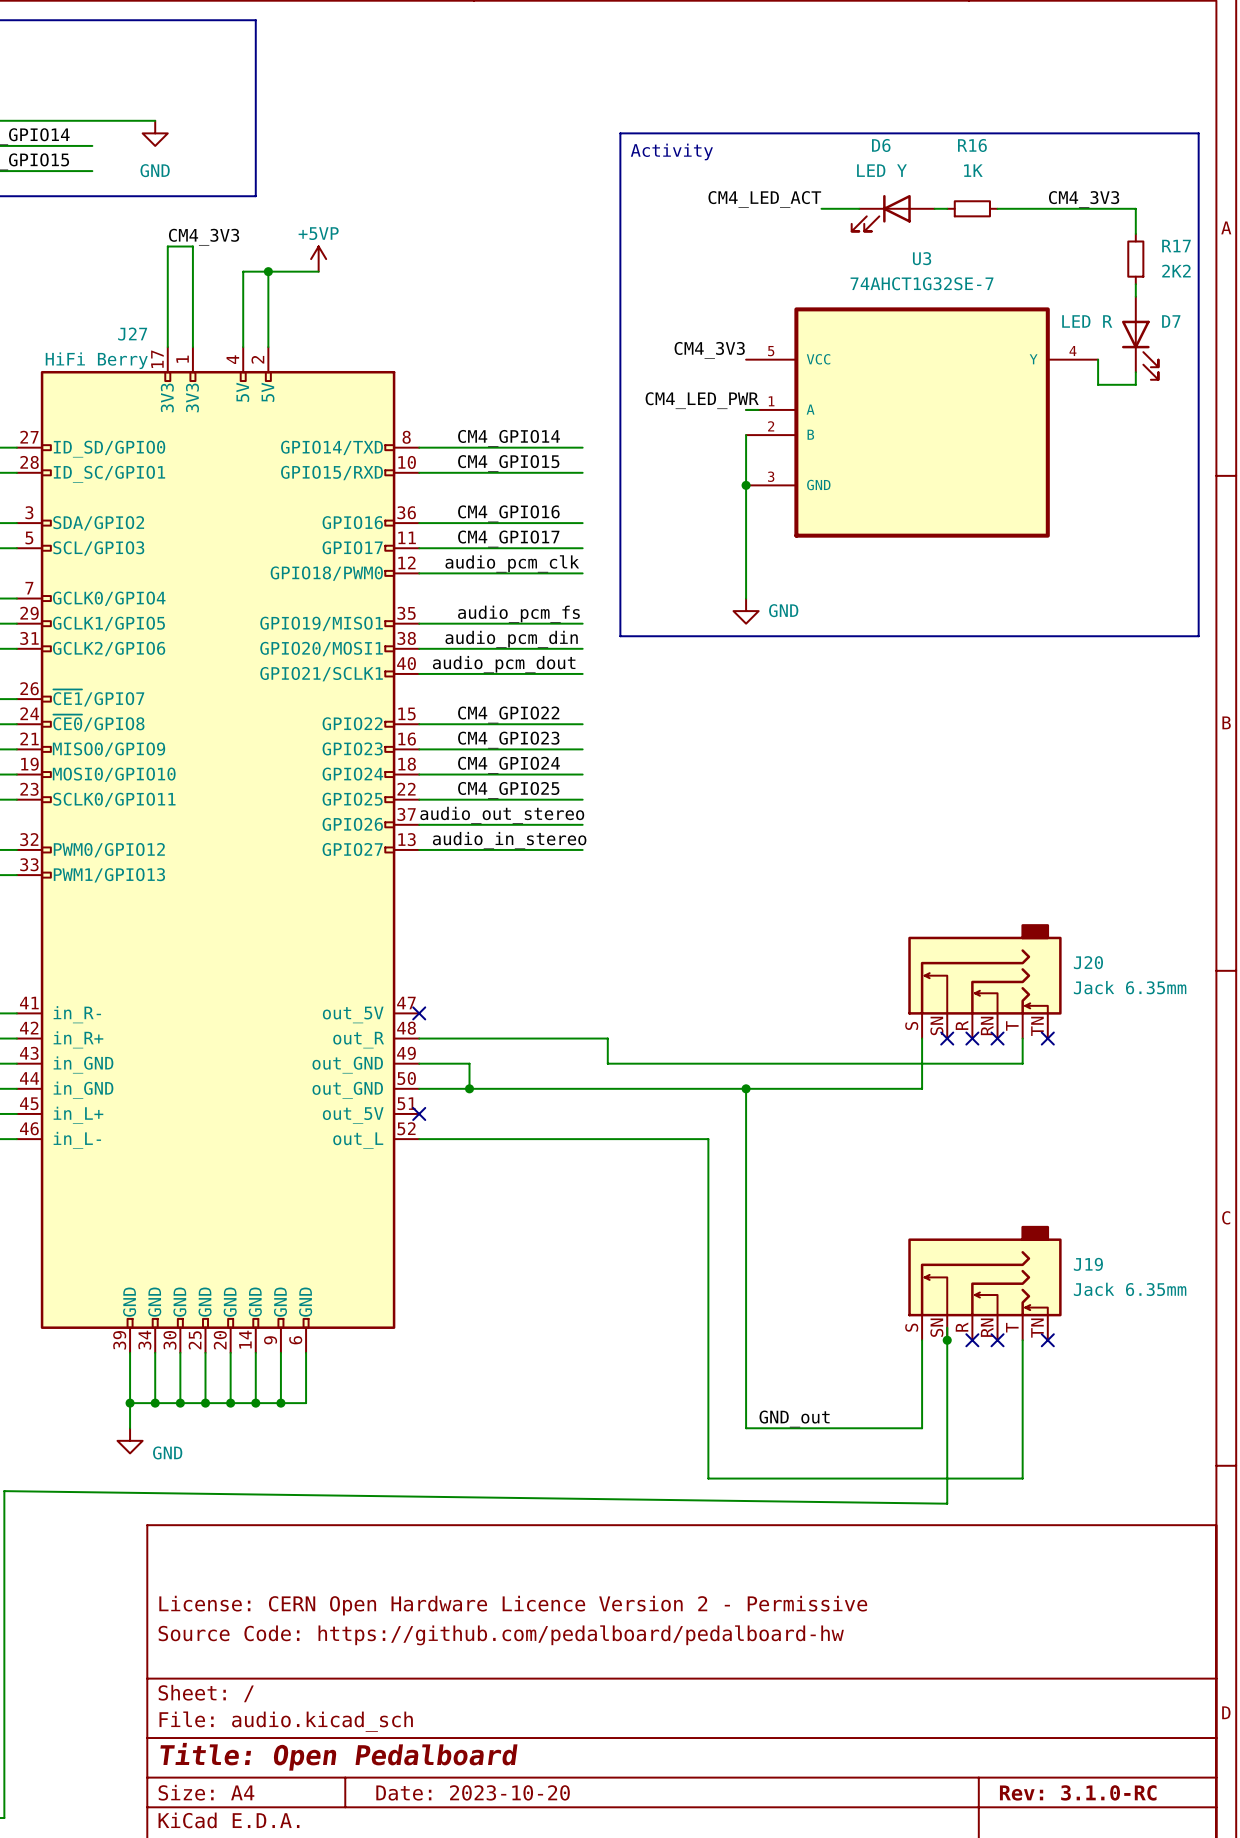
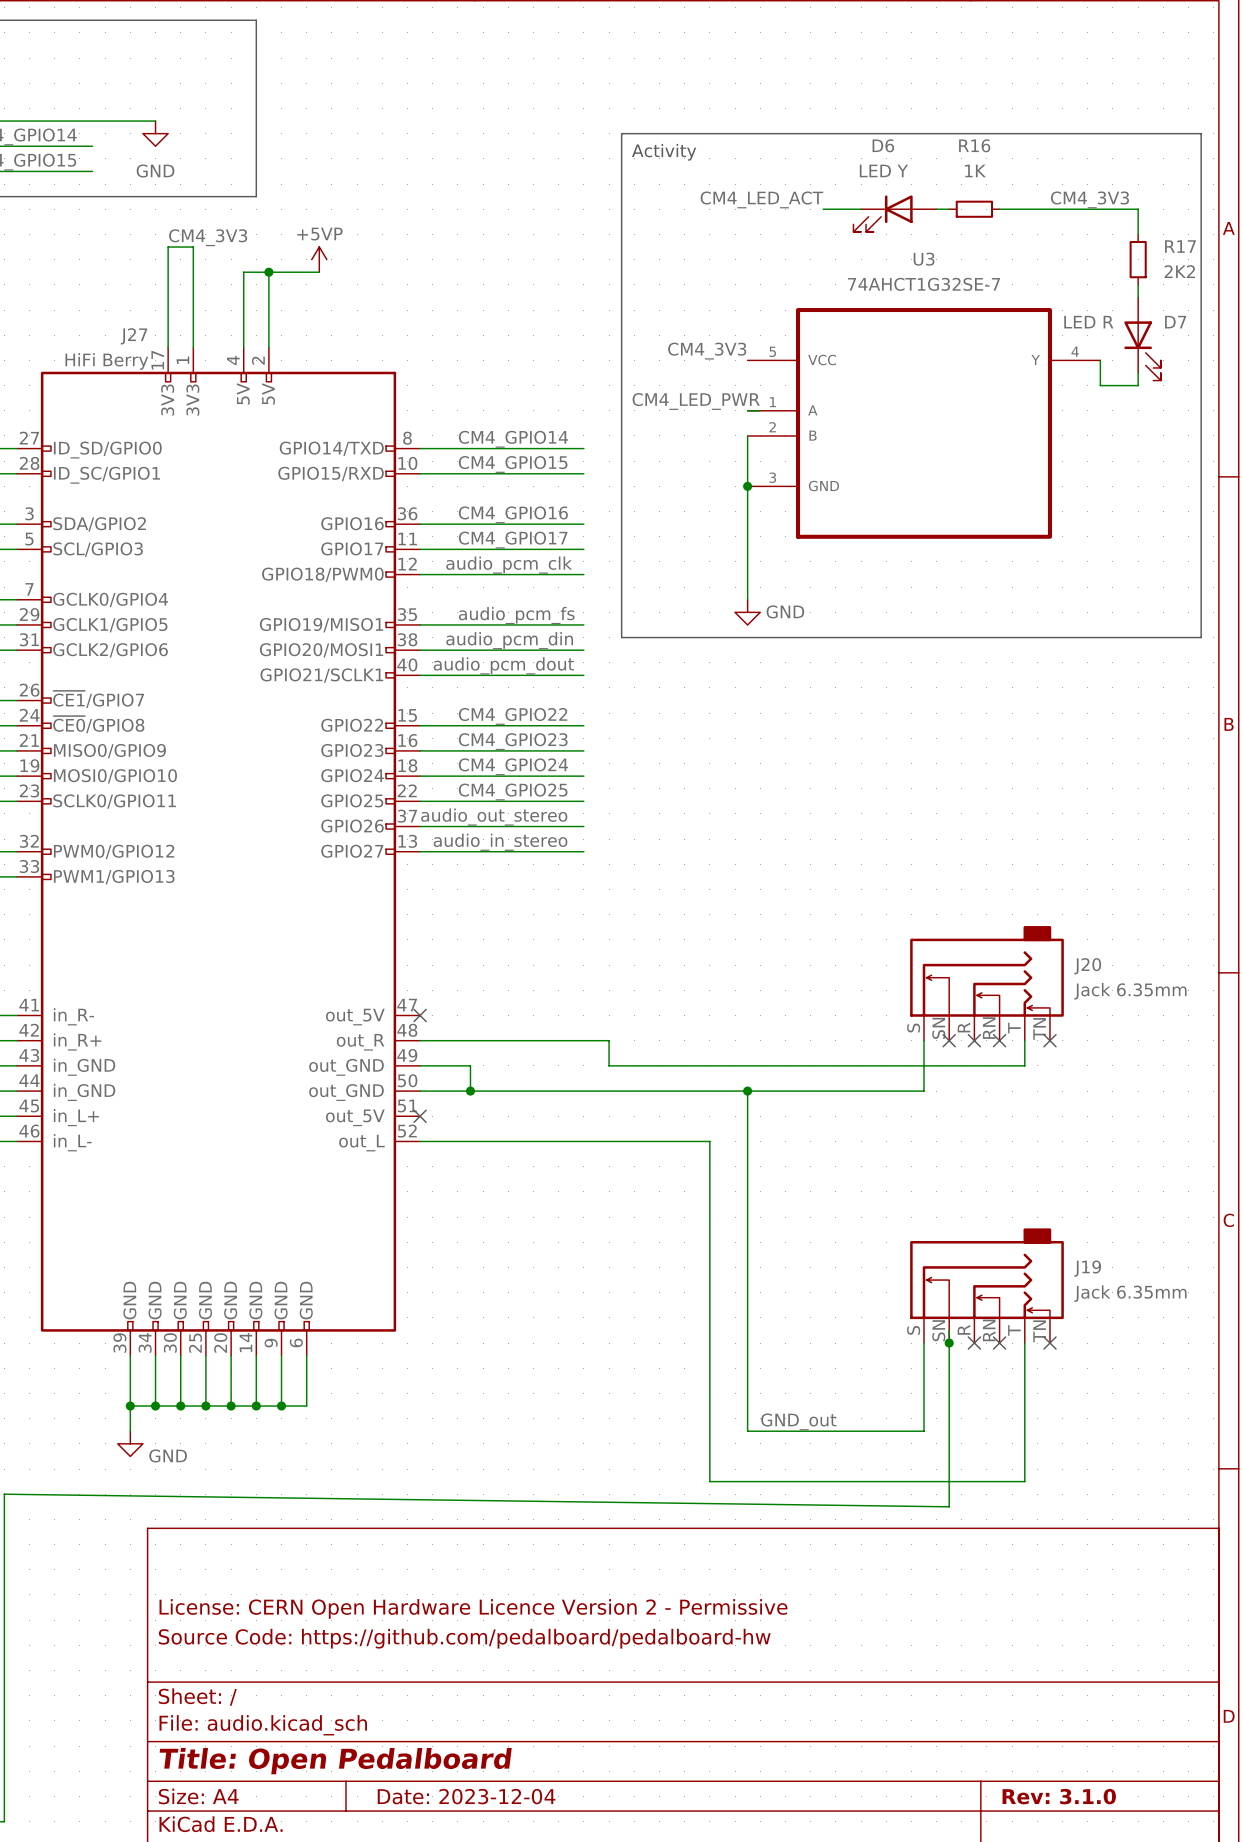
title block: Date: 2023-10-20 (473, 1792) -> Date: 2023-12-04 (466, 1796)
title block: Rev: 3.1.0-RC (1078, 1792) -> Rev: 3.1.0 (1059, 1796)

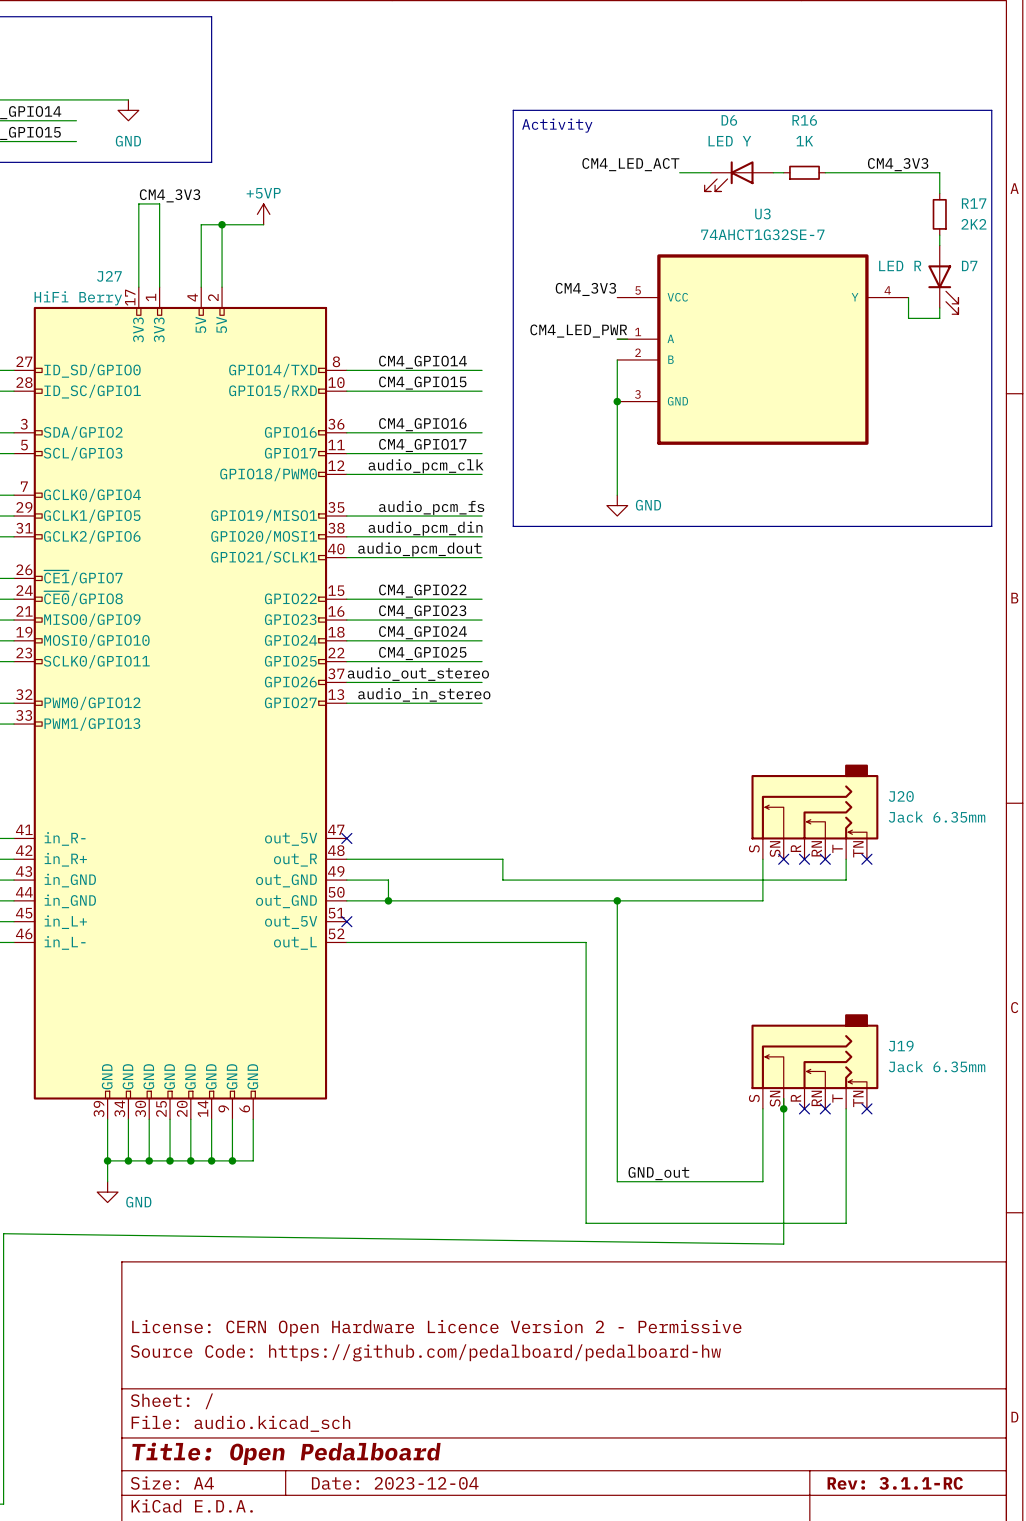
title block: Rev: 3.1.0 (1059, 1796) -> Rev: 3.1.1-RC (895, 1483)

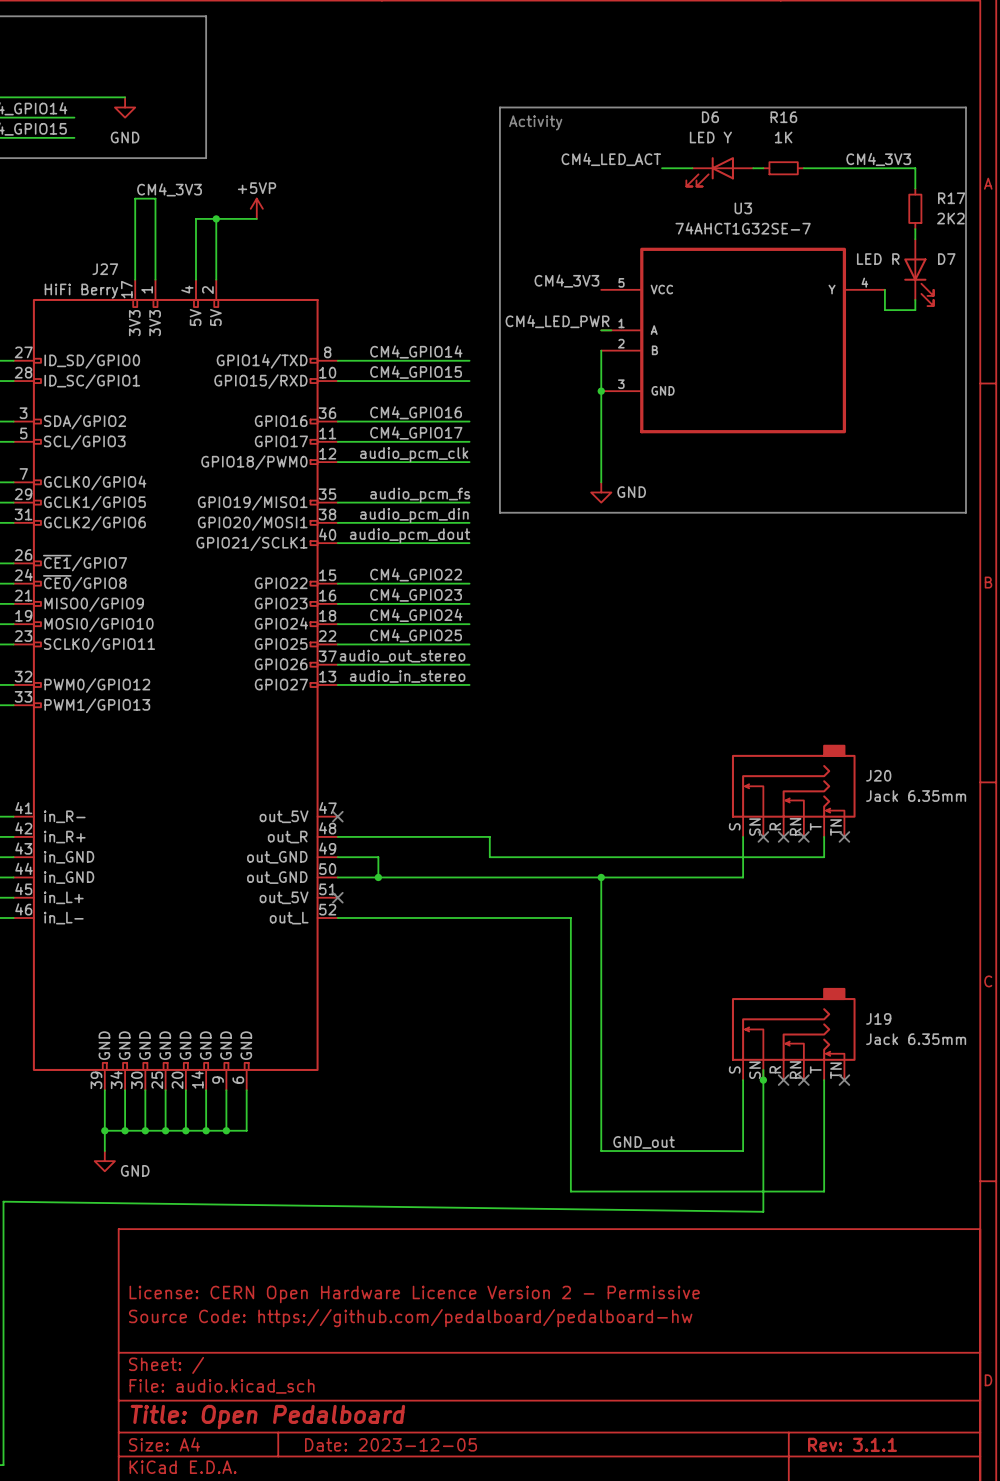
title block: Date: 2023-12-04 (395, 1483) -> Date: 2023-12-05 (391, 1444)
title block: Rev: 3.1.1-RC (895, 1483) -> Rev: 3.1.1 (852, 1444)

